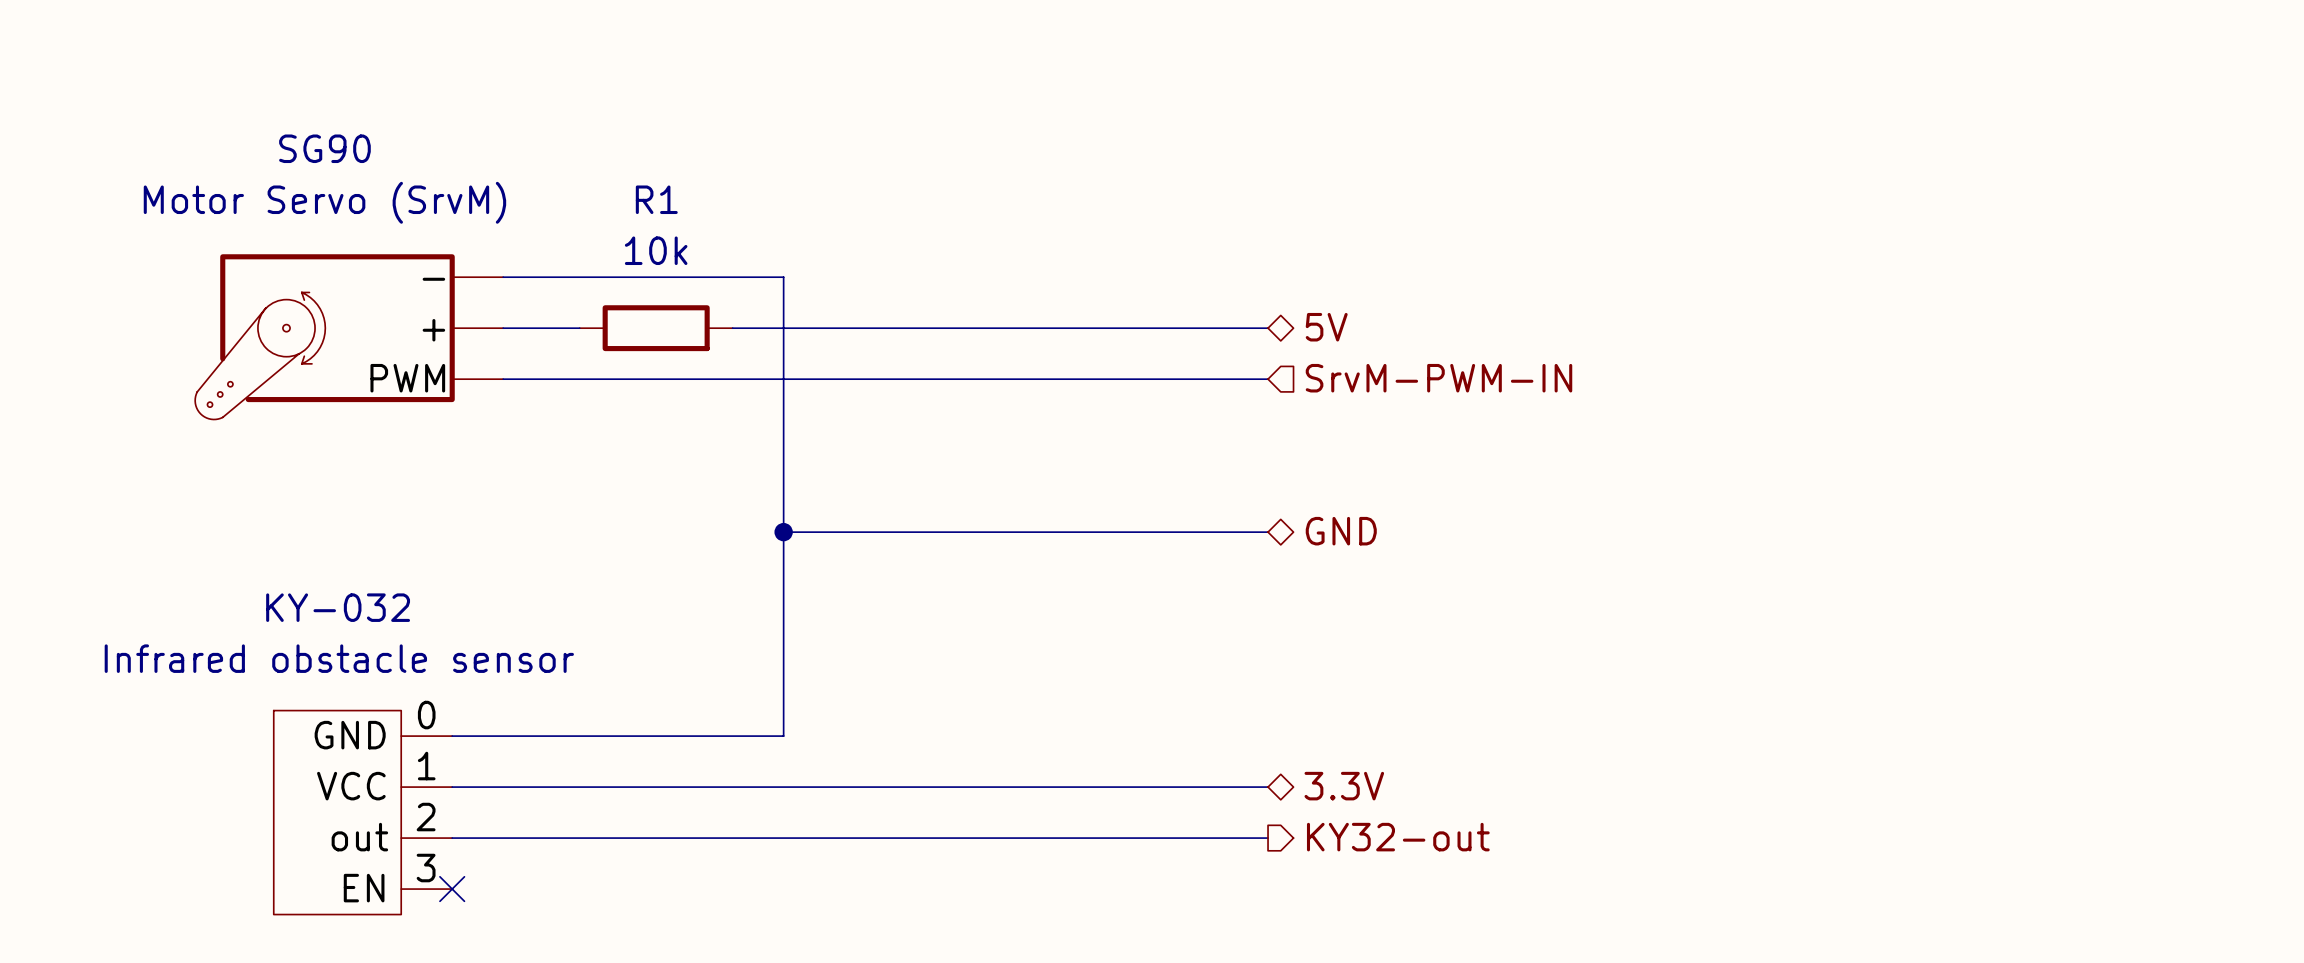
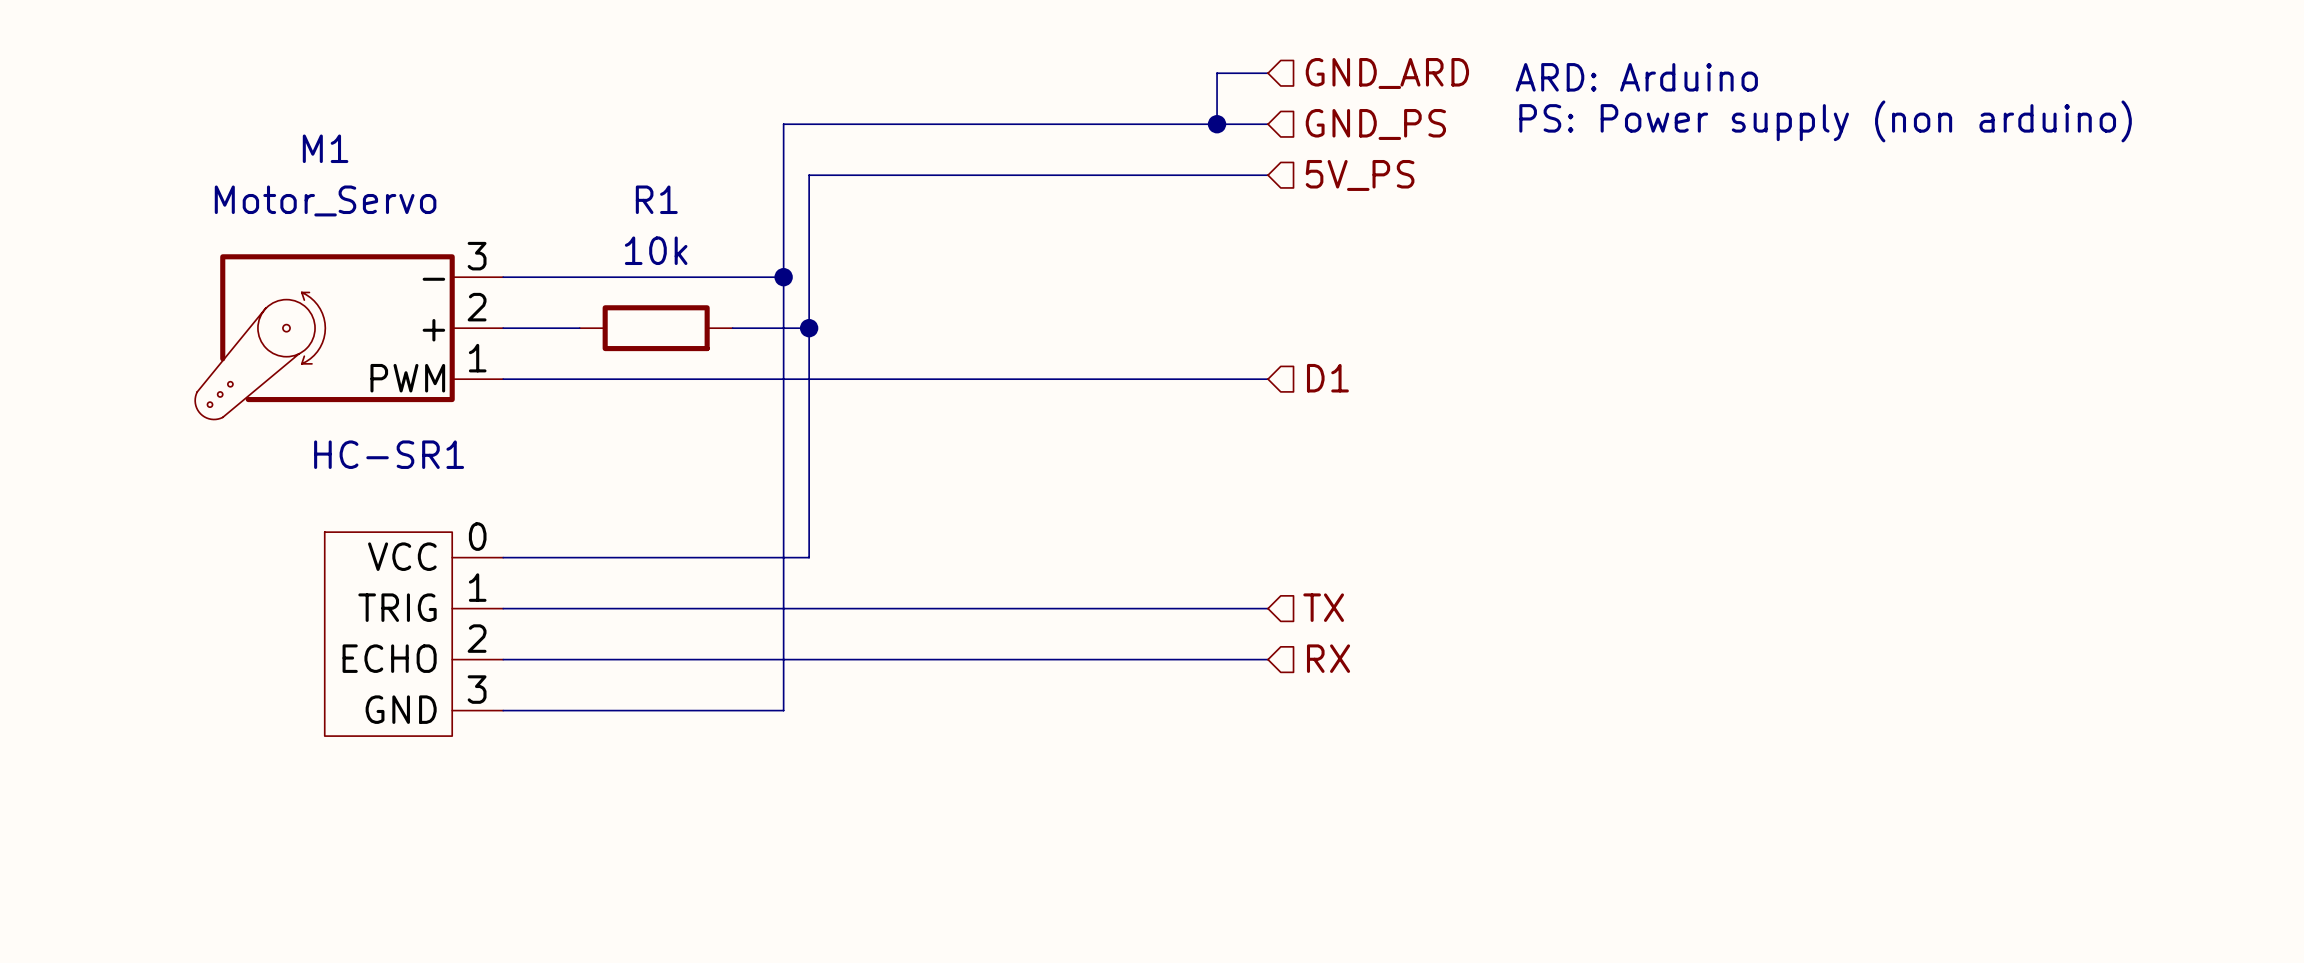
wire: none -> (1268, 73) (1217, 73) (1217, 124)
hierarchical label: none -> GND_ARD (1387, 73)
text: none -> ARD: Arduino (1636, 77)
text: none -> PS: Power supply (non arduino) (1825, 121)
junction: none -> (1217, 124)
wire: none -> (1268, 124) (783, 124) (783, 277)
hierarchical label: none -> GND_PS (1375, 124)
SG90 name: SG90 (324, 148) -> M1 (325, 148)
wire: none -> (1268, 175) (809, 175) (809, 557) (503, 557)
hierarchical label: none -> 5V_PS (1360, 175)
SG90 value: Motor Servo (SrvM) (324, 202) -> Motor_Servo (325, 200)
SG90 pin number: none -> 3 (477, 256)
junction: none -> (783, 277)
SG90 pin number: none -> 2 (477, 307)
hierarchical label: 5V (1326, 327) -> none
wire: (809, 328) (1268, 328) -> none
junction: none -> (809, 328)
SG90 pin number: none -> 1 (477, 358)
hierarchical label: SrvM-PWM-IN (1438, 378) -> D1 (1327, 378)
hierarchical label: GND (1341, 531) -> none
wire: (783, 532) (1268, 532) -> none
junction: (783, 532) -> none
hierarchical label: none -> TX (1323, 607)
wire: none -> (503, 608) (1268, 608)
HC-SR1: none -> (413, 634)
hierarchical label: none -> RX (1328, 658)
wire: none -> (503, 659) (1268, 659)
wire: (783, 710) (783, 736) (452, 736) -> (783, 710) (503, 710)
hierarchical label: 3.3V (1344, 786) -> none
wire: (452, 787) (1268, 787) -> none
KY-032: Infrared obstacle sensor (362, 812) -> none
hierarchical label: KY32-out (1398, 837) -> none
wire: (452, 838) (1268, 838) -> none
no-connect mark: (452, 889) -> none

